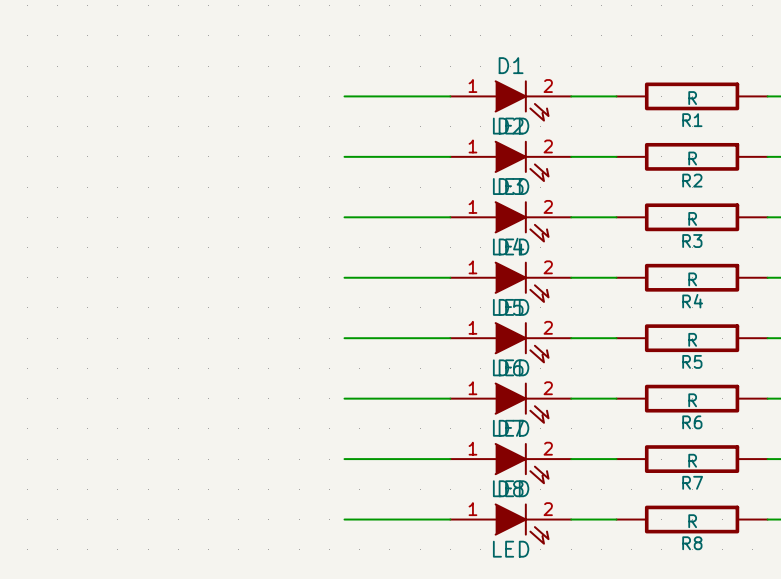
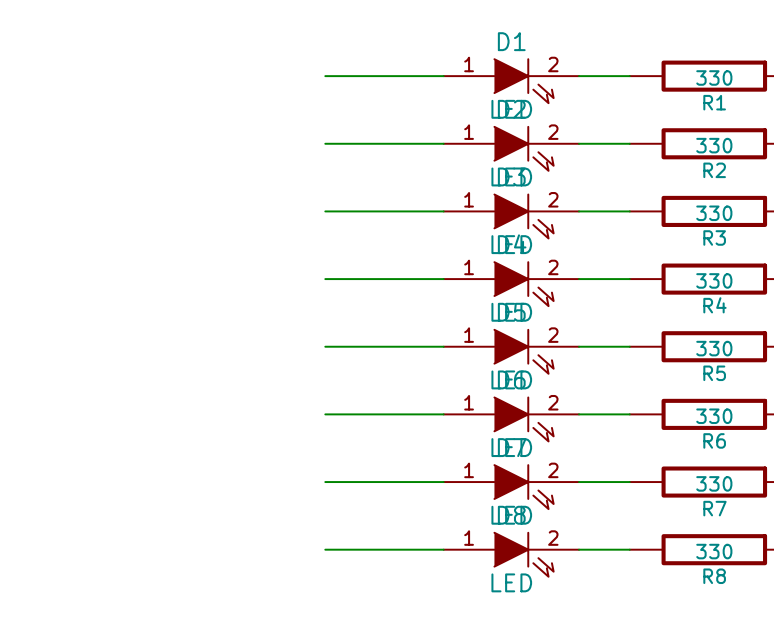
R1 value: R (692, 98) -> 330 (714, 77)
R2 value: R (692, 158) -> 330 (714, 145)
R3 value: R (692, 218) -> 330 (714, 213)
R4 value: R (692, 279) -> 330 (714, 280)
R5 value: R (692, 339) -> 330 (714, 348)
R6 value: R (692, 400) -> 330 (714, 416)
R7 value: R (692, 460) -> 330 (714, 483)
R8 value: R (692, 521) -> 330 (714, 551)

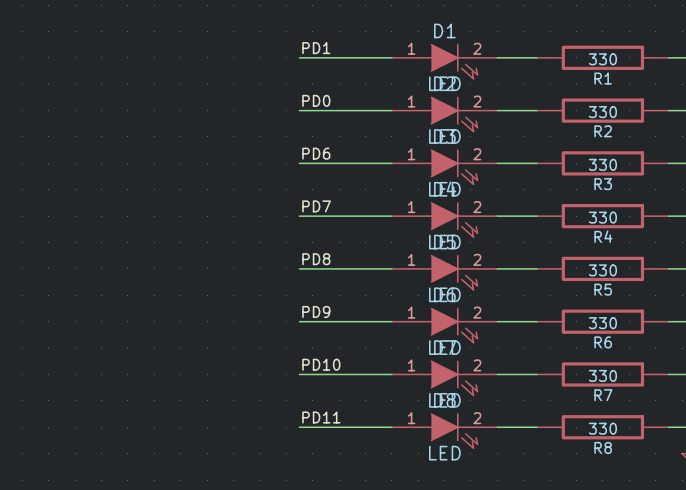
label: none -> PD1 (316, 48)
label: none -> PD0 (316, 100)
label: none -> PD6 (316, 153)
label: none -> PD7 (316, 206)
label: none -> PD8 (316, 259)
label: none -> PD9 (316, 311)
label: none -> PD10 (321, 364)
label: none -> PD11 (321, 417)

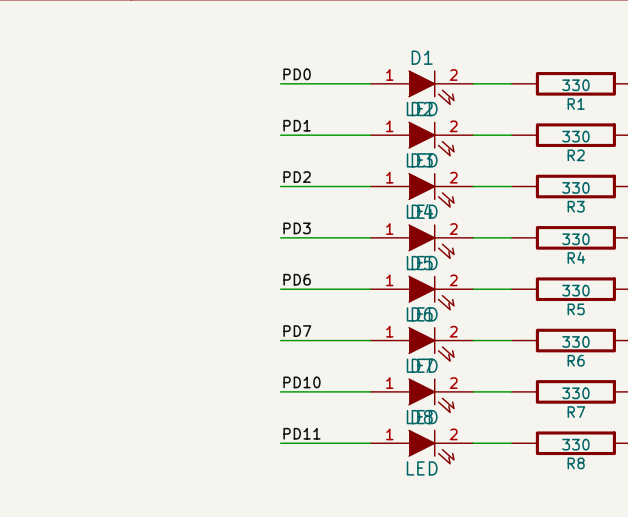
label: PD1 (316, 48) -> PD0 (297, 74)
label: PD0 (316, 100) -> PD1 (297, 125)
label: PD6 (316, 153) -> PD2 (297, 177)
label: PD7 (316, 206) -> PD3 (297, 228)
label: PD8 (316, 259) -> PD6 (297, 279)
label: PD9 (316, 311) -> PD7 (297, 331)

